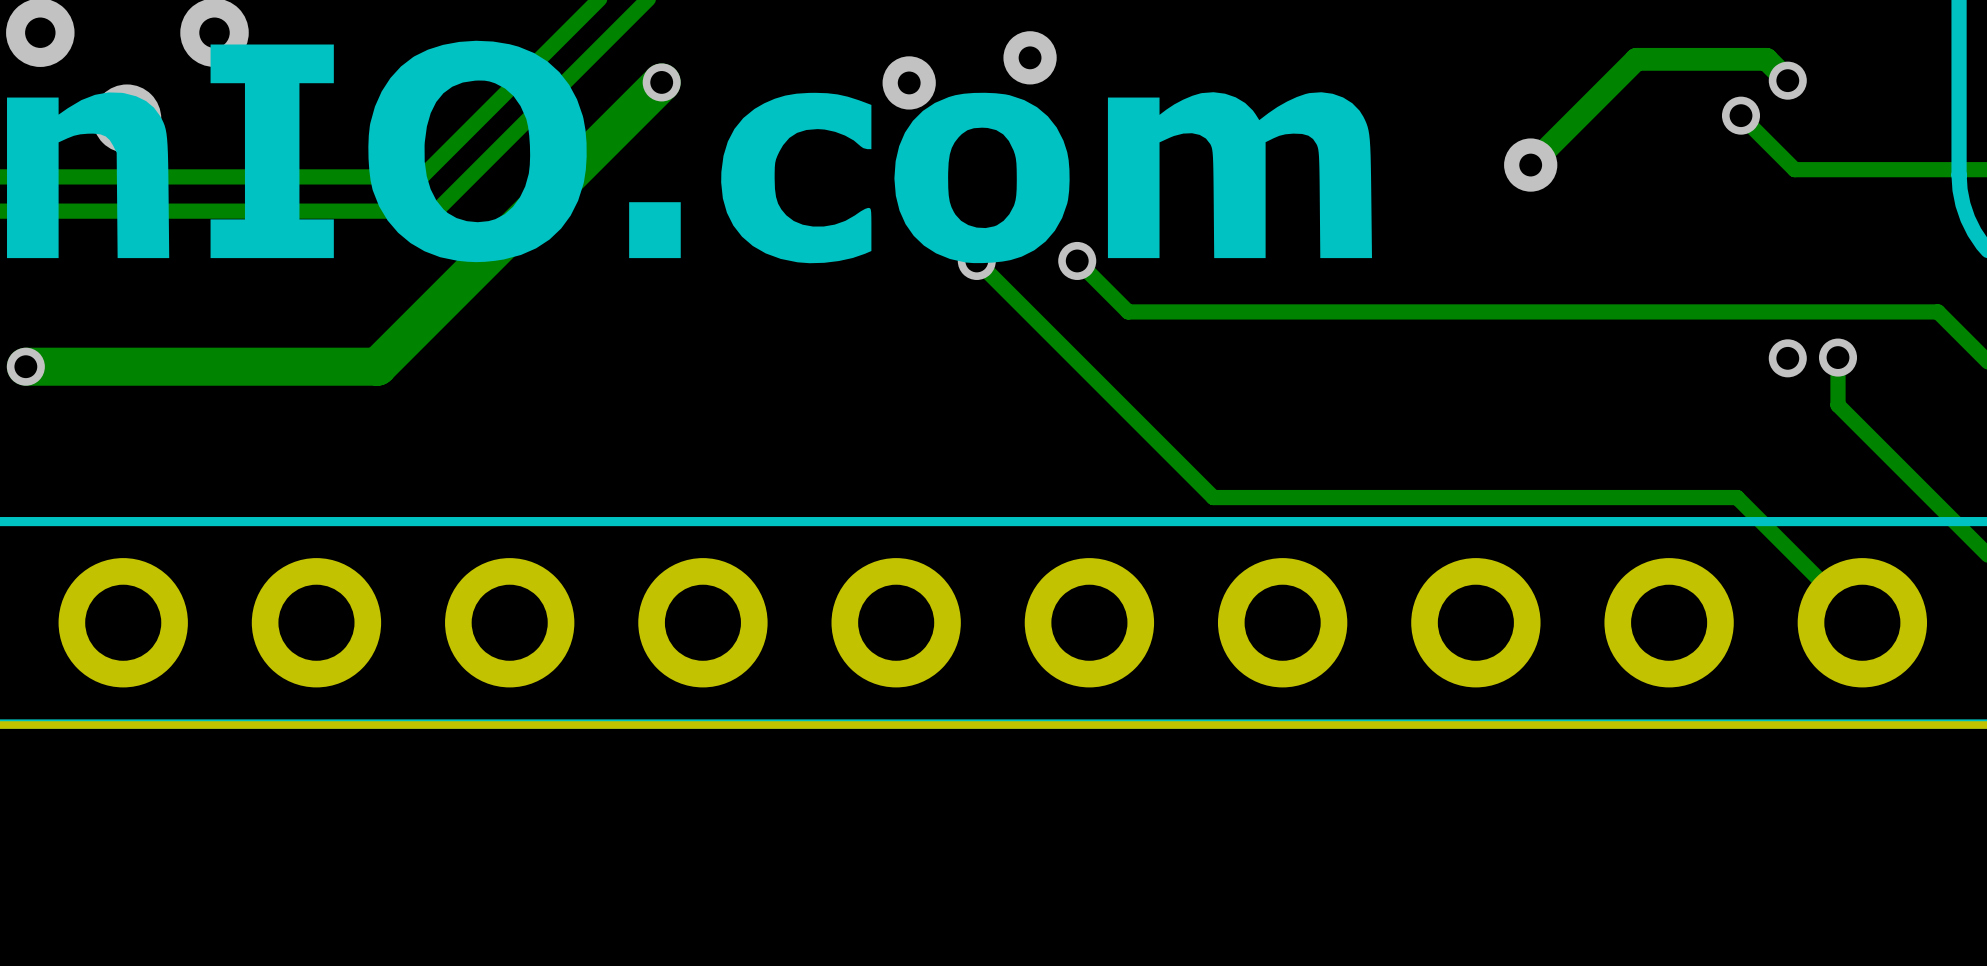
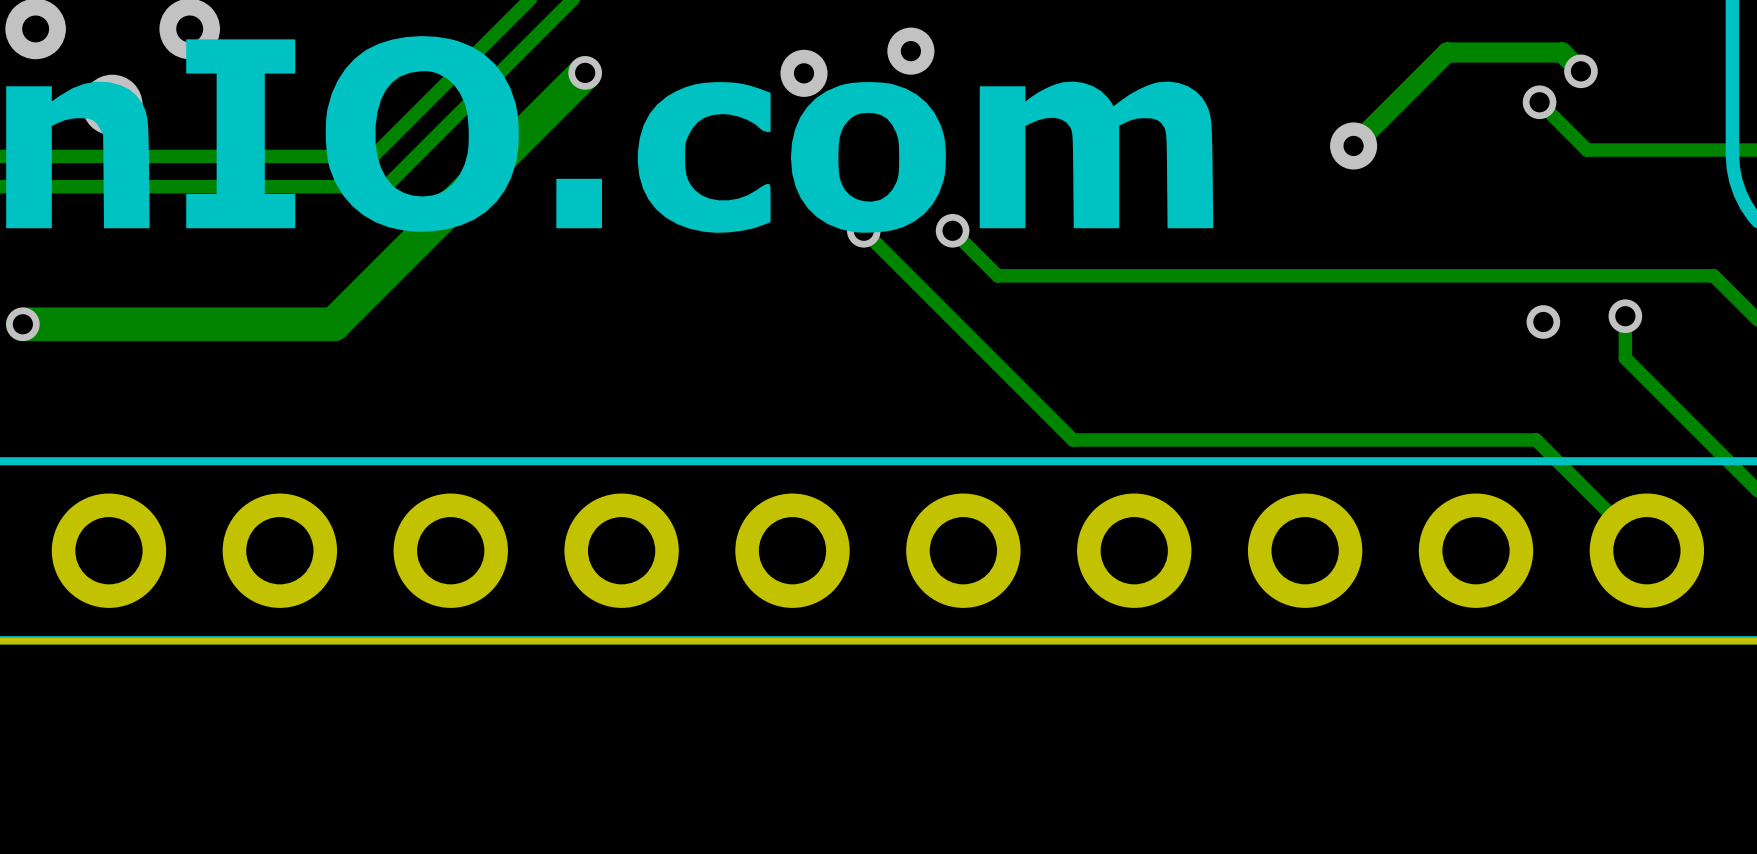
via position: (1787, 358) -> (1543, 322)

